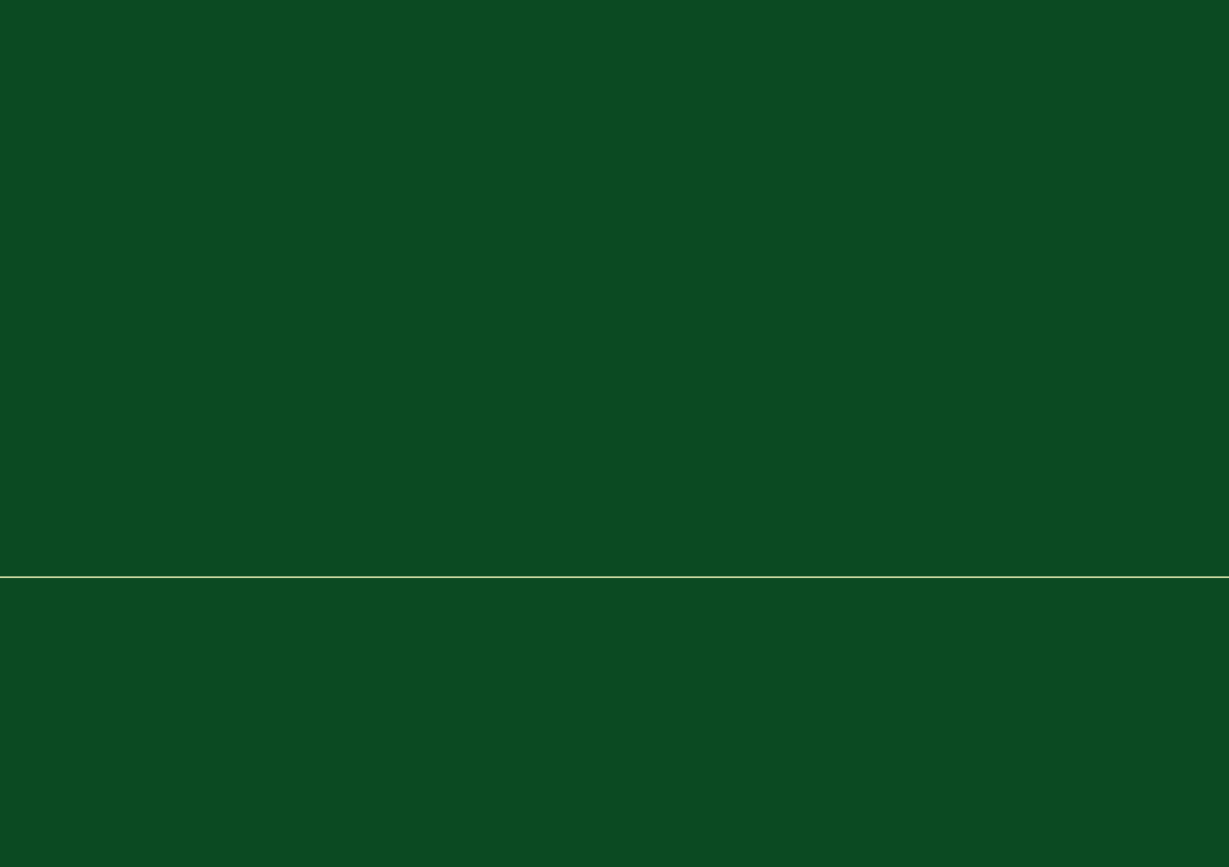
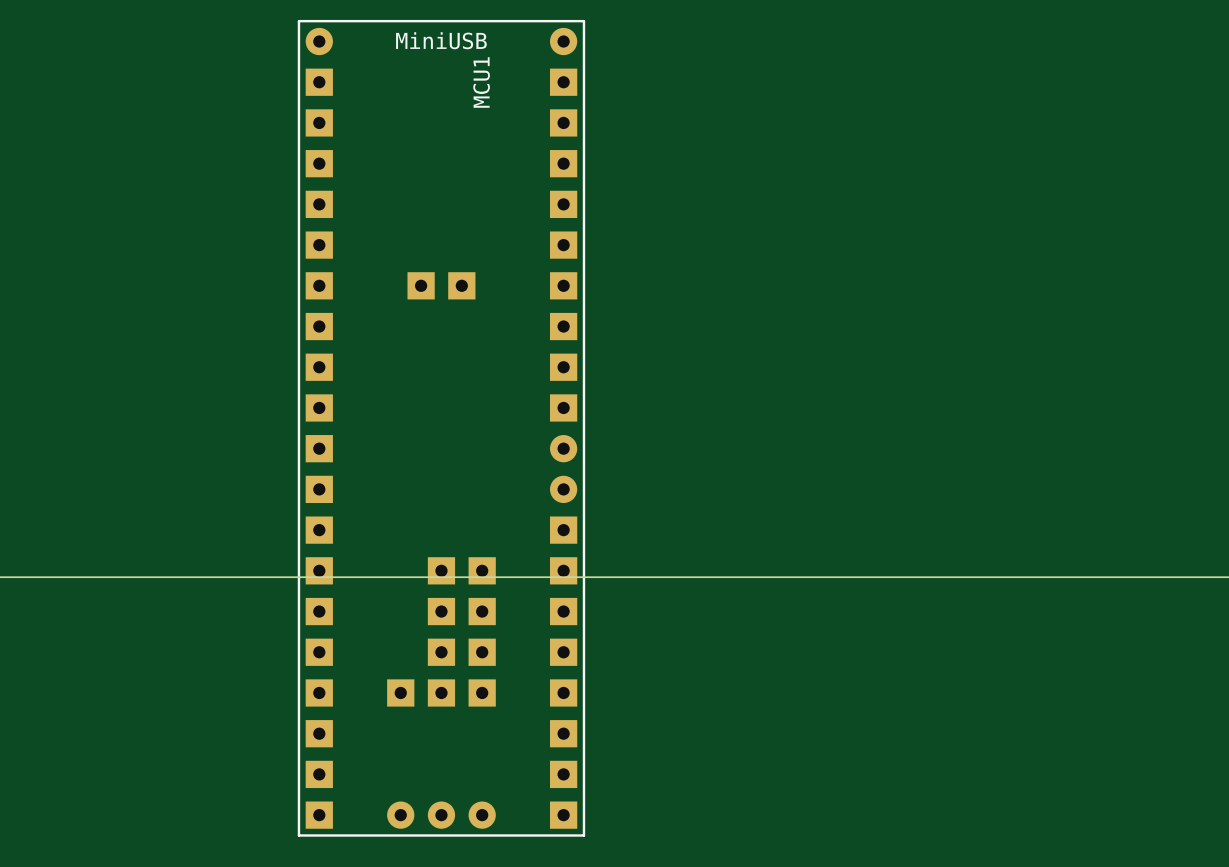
MCU1: none -> (441, 428)

